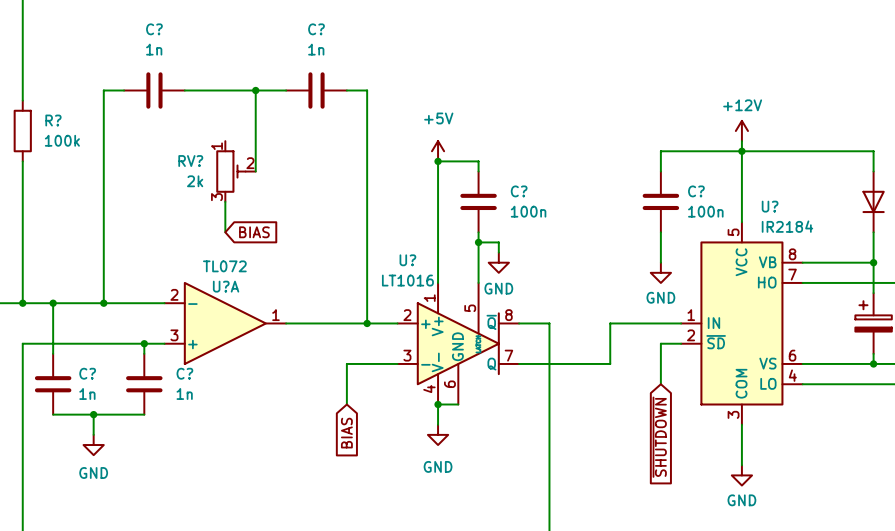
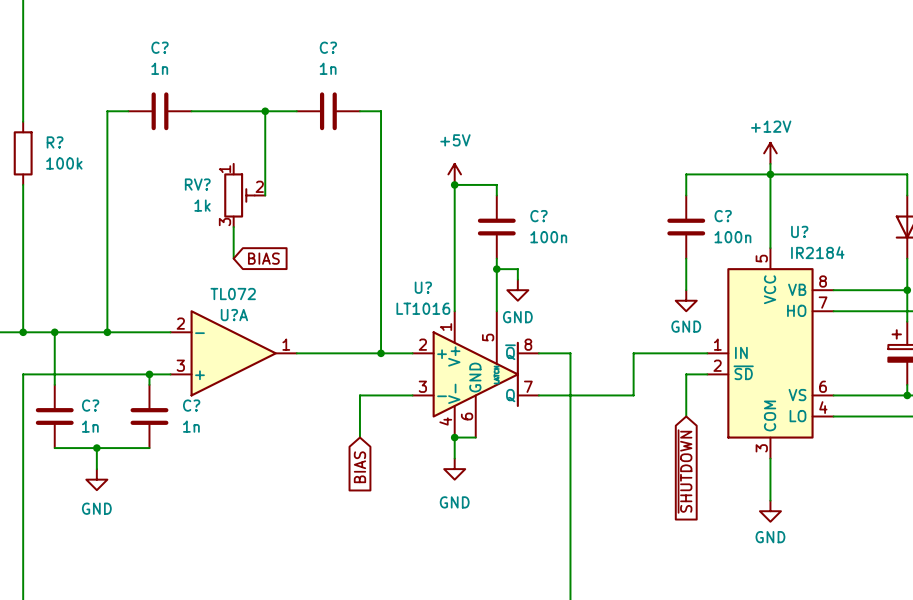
RV? value: 2k (195, 181) -> 1k (202, 205)

